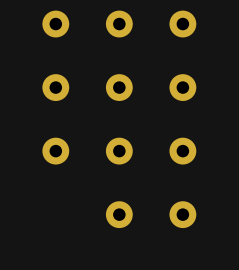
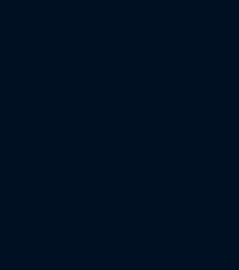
part: (55, 24) -> none
part: (119, 24) -> none
part: (182, 24) -> none
part: (55, 87) -> none
part: (119, 87) -> none
part: (182, 87) -> none
part: (55, 151) -> none
part: (119, 151) -> none
part: (182, 151) -> none
part: (119, 214) -> none
part: (182, 214) -> none

